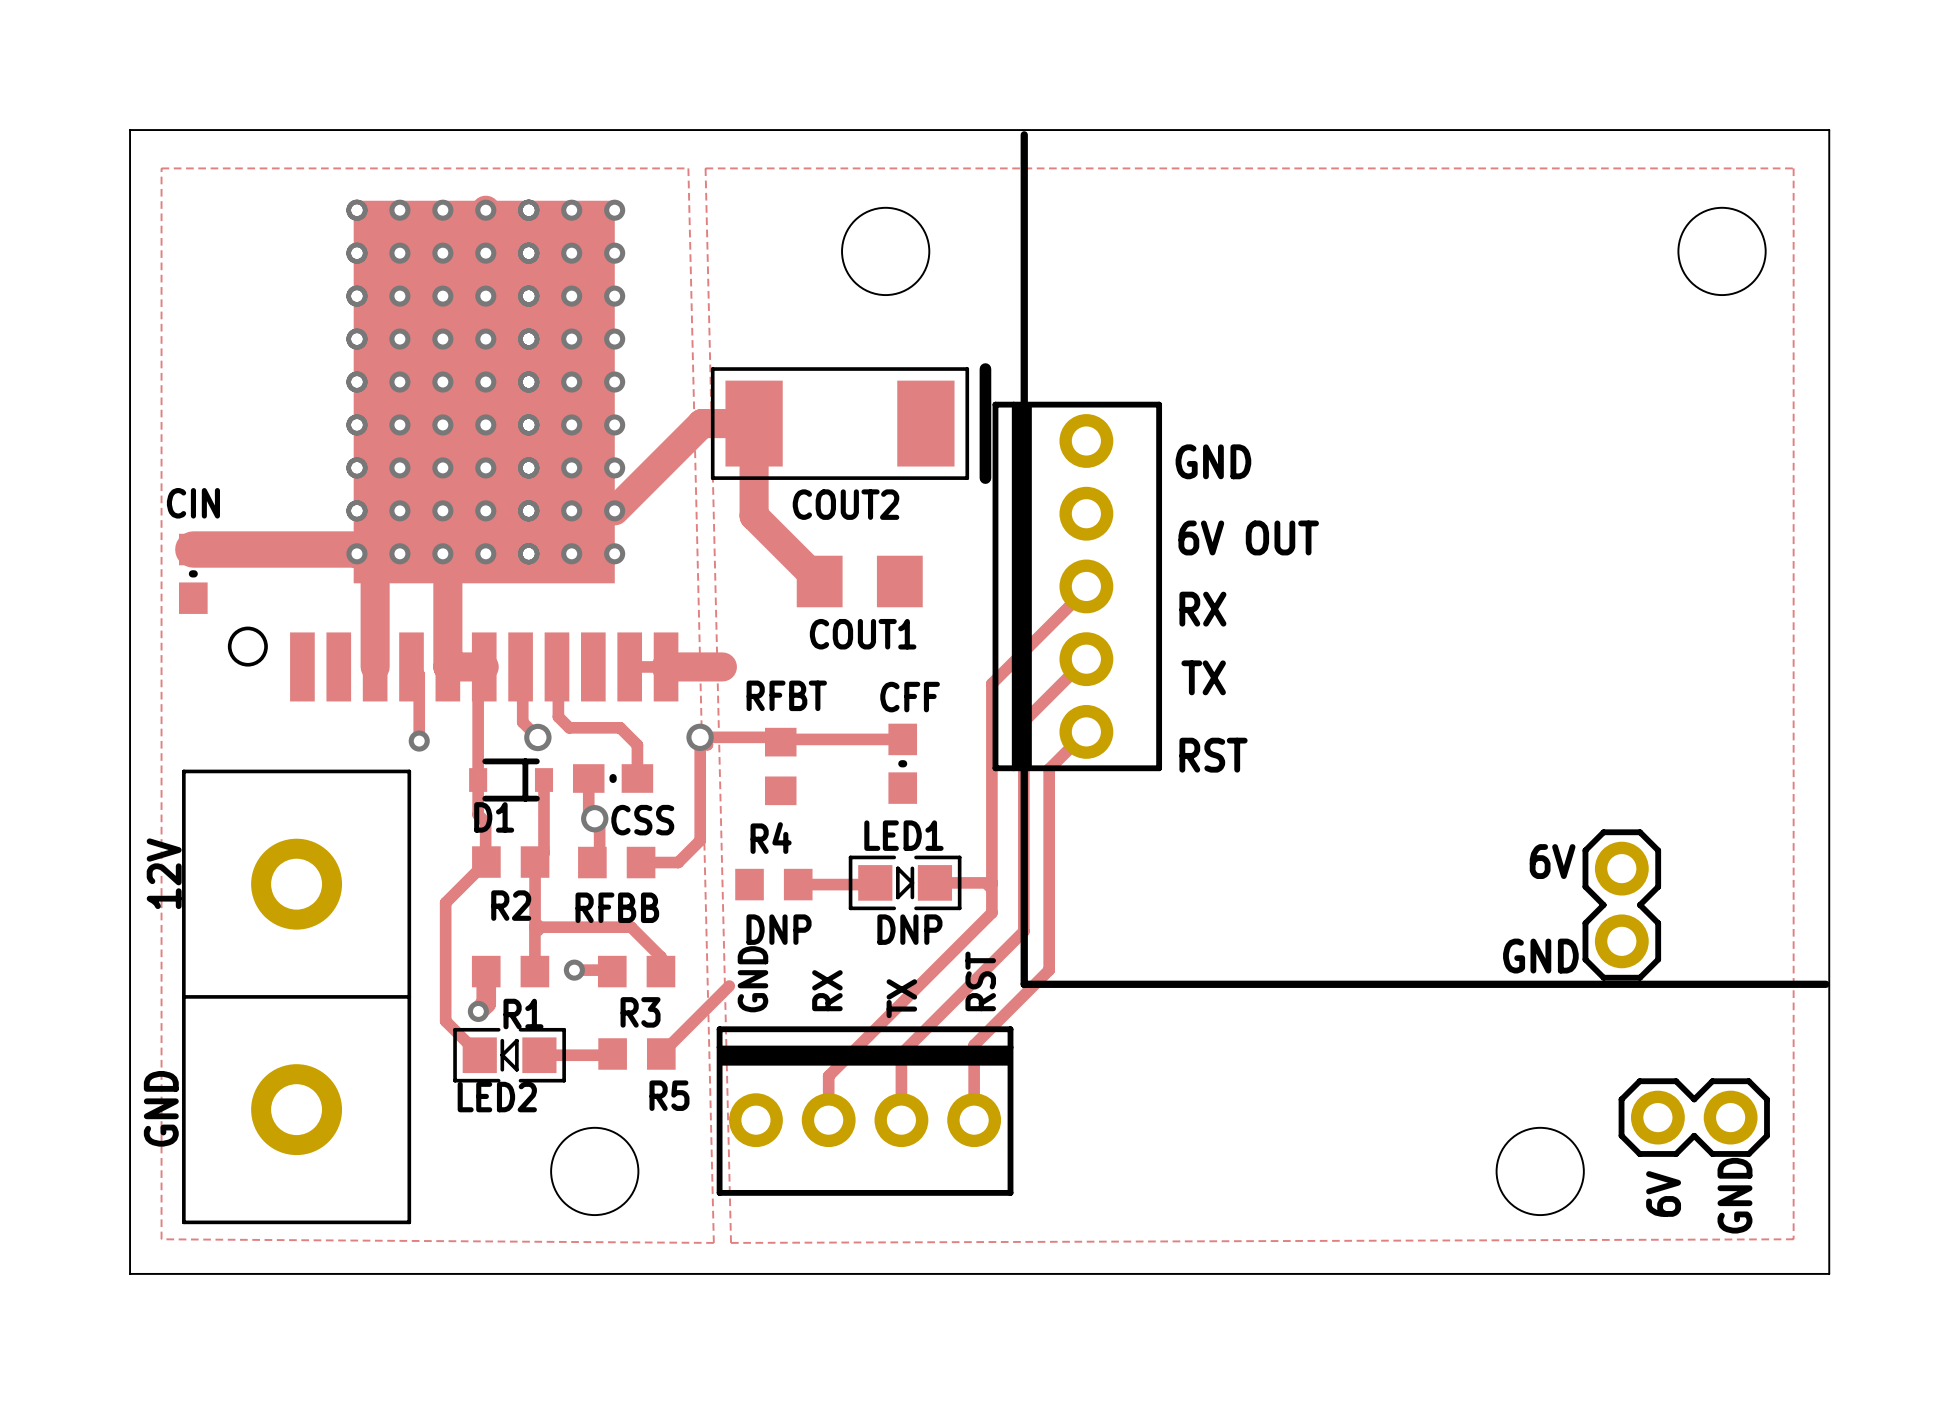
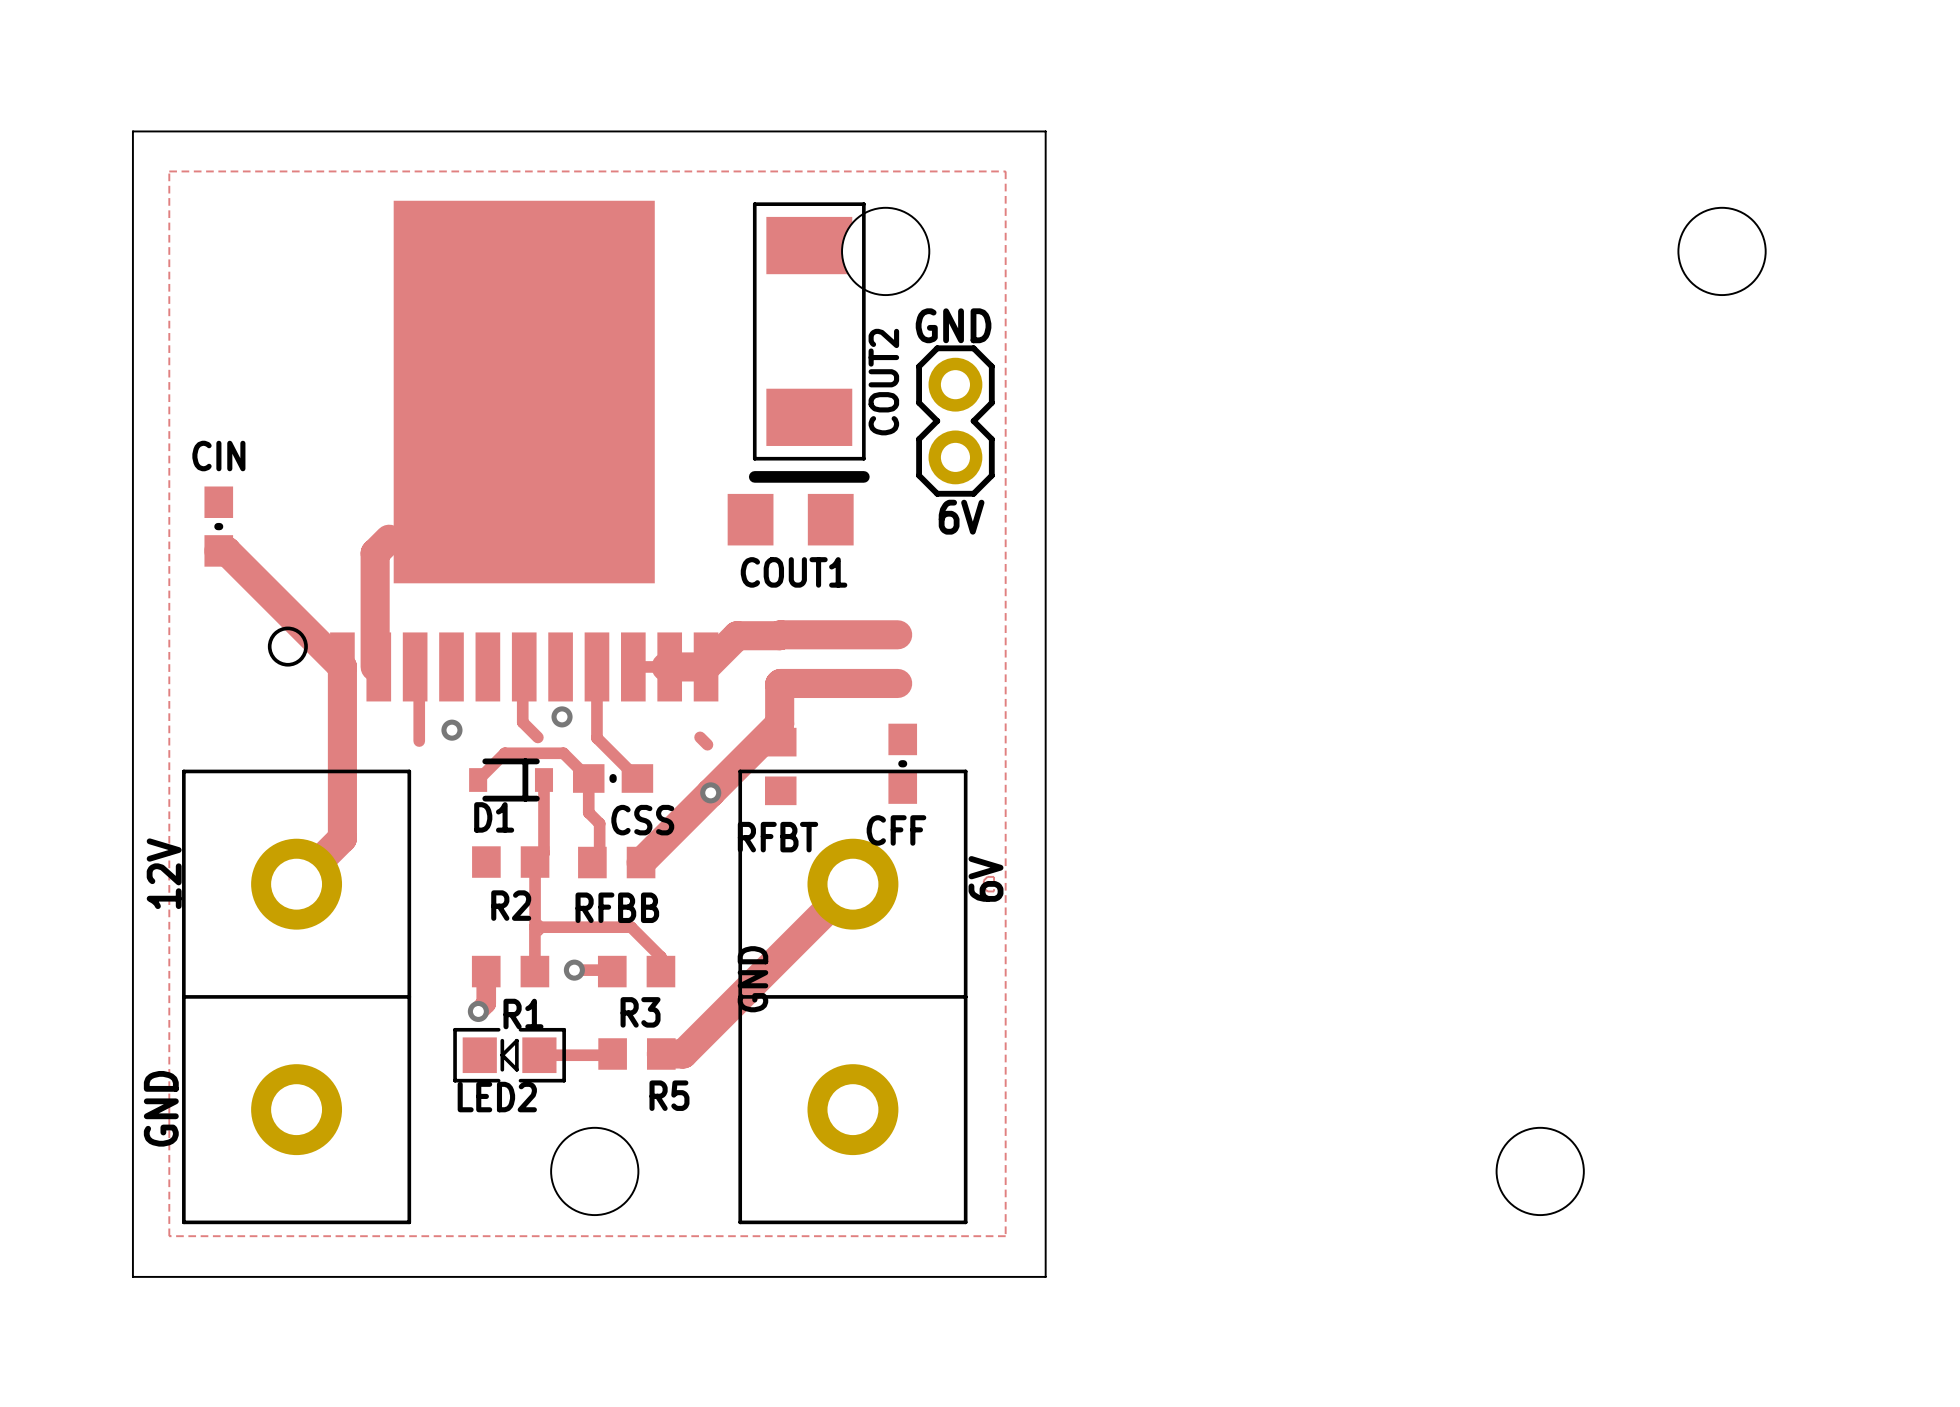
board edge: (130, 130) (1829, 130) (1829, 1273) (130, 1273) (130, 130) -> (132, 131) (132, 1276) (1045, 1276) (1045, 131) (132, 131)
line: (1024, 134) (1024, 984) (1825, 984) -> none
zone outline: (161, 168) (688, 168) (713, 1242) (161, 1239) (161, 168) -> (169, 171) (169, 1236) (1005, 1236) (1005, 171) (169, 171)
zone outline: (705, 168) (1793, 168) (1793, 1239) (731, 1242) (705, 168) -> none
via: (356, 210) -> none
via: (399, 210) -> none
via: (442, 210) -> none
via: (485, 210) -> none
via: (528, 210) -> none
via: (571, 210) -> none
via: (614, 210) -> none
via: (356, 253) -> none
via: (399, 253) -> none
via: (442, 253) -> none
via: (485, 253) -> none
via: (528, 253) -> none
via: (571, 253) -> none
via: (614, 253) -> none
via: (356, 296) -> none
via: (399, 296) -> none
via: (442, 296) -> none
via: (485, 296) -> none
via: (528, 296) -> none
via: (571, 296) -> none
via: (614, 296) -> none
via: (356, 339) -> none
via: (399, 339) -> none
via: (442, 339) -> none
via: (485, 339) -> none
via: (528, 339) -> none
via: (571, 339) -> none
via: (614, 339) -> none
via: (356, 382) -> none
via: (399, 382) -> none
via: (442, 382) -> none
via: (485, 382) -> none
via: (528, 382) -> none
via: (571, 382) -> none
via: (614, 382) -> none
part: none -> (955, 421)
COUT2 rotation: 0° (851, 423) -> 90° clockwise (809, 342)
via: (356, 424) -> none
via: (399, 424) -> none
via: (442, 424) -> none
via: (485, 424) -> none
via: (528, 424) -> none
via: (571, 424) -> none
via: (614, 424) -> none
part position: (453, 451) -> (493, 451)
text position: GND (1213, 461) -> GND (953, 325)
via: (356, 467) -> none
via: (399, 467) -> none
via: (442, 467) -> none
via: (485, 467) -> none
via: (528, 467) -> none
via: (571, 467) -> none
via: (614, 467) -> none
COUT2 name position: COUT2 (846, 504) -> COUT2 (883, 382)
via: (356, 510) -> none
via: (399, 510) -> none
via: (442, 510) -> none
via: (485, 510) -> none
via: (528, 510) -> none
via: (571, 510) -> none
track: (614, 510) (701, 423) (754, 423) (754, 515) (819, 581) -> none
via: (614, 510) -> none
text: none -> 6V (961, 517)
track: (399, 529) (378, 549) (193, 549) -> none
track: (442, 529) (447, 534) (447, 666) (485, 667) (485, 687) (478, 695) (478, 814) (485, 822) (486, 862) (445, 902) (445, 1021) (479, 1055) -> none
text: 6V OUT (1248, 537) -> none
track: none -> (218, 550) (226, 550) (342, 666) (342, 838) (296, 884)
via: (356, 553) -> none
via: (399, 553) -> none
via: (442, 553) -> none
via: (485, 553) -> none
via: (528, 553) -> none
via: (571, 553) -> none
via: (614, 553) -> none
CIN position: (193, 573) -> (218, 526)
COUT1 position: (859, 581) -> (790, 519)
part: (1077, 586) -> none
track: (1086, 586) (1086, 589) (991, 683) (991, 912) (828, 1076) (828, 1120) -> none
text: RX (1202, 609) -> none
track: (1086, 659) (1023, 721) (1023, 931) (901, 1053) (901, 1120) -> none
track: (556, 666) (558, 716) (569, 727) (620, 727) (637, 745) (637, 778) -> (596, 666) (596, 738) (637, 778)
track: (706, 666) (722, 666) -> (706, 666) (737, 635) (897, 634)
text: TX (1203, 677) -> none
RFBT name position: RFBT (786, 695) -> RFBT (777, 837)
CFF name position: CFF (910, 697) -> CFF (896, 830)
via: none -> (562, 716)
track: (1086, 731) (1049, 769) (1049, 970) (974, 1045) (974, 1120) -> none
via: (537, 737) -> none
via: (700, 737) -> none
track: (902, 739) (783, 739) (780, 742) (775, 737) (700, 737) (700, 840) (678, 862) (641, 862) -> (897, 683) (780, 683) (779, 723) (641, 862)
via position: (419, 741) -> (451, 730)
text: RST (1213, 755) -> none
track: none -> (588, 778) (563, 753) (504, 753) (478, 780)
via: none -> (710, 792)
via: (594, 818) -> none
text: 6V (1552, 861) -> none
text: none -> 6V (986, 878)
LED1: (905, 882) -> none
track: (934, 882) (991, 882) -> none
R4: (773, 884) -> none
track: (798, 884) (875, 884) (875, 882) (886, 884) -> none
part: (1621, 904) -> none
text: DNP (779, 929) -> none
text: DNP (909, 929) -> none
text: GND (1540, 956) -> none
text: RST (980, 981) -> none
track: (729, 986) (661, 1053) -> (852, 884) (683, 1053) (661, 1053)
text: RX (827, 990) -> none
part: none -> (852, 996)
text: TX (901, 998) -> none
part: (865, 1111) -> none
part: (1694, 1117) -> none
text: 6V (1663, 1193) -> none
text: GND (1734, 1195) -> none

